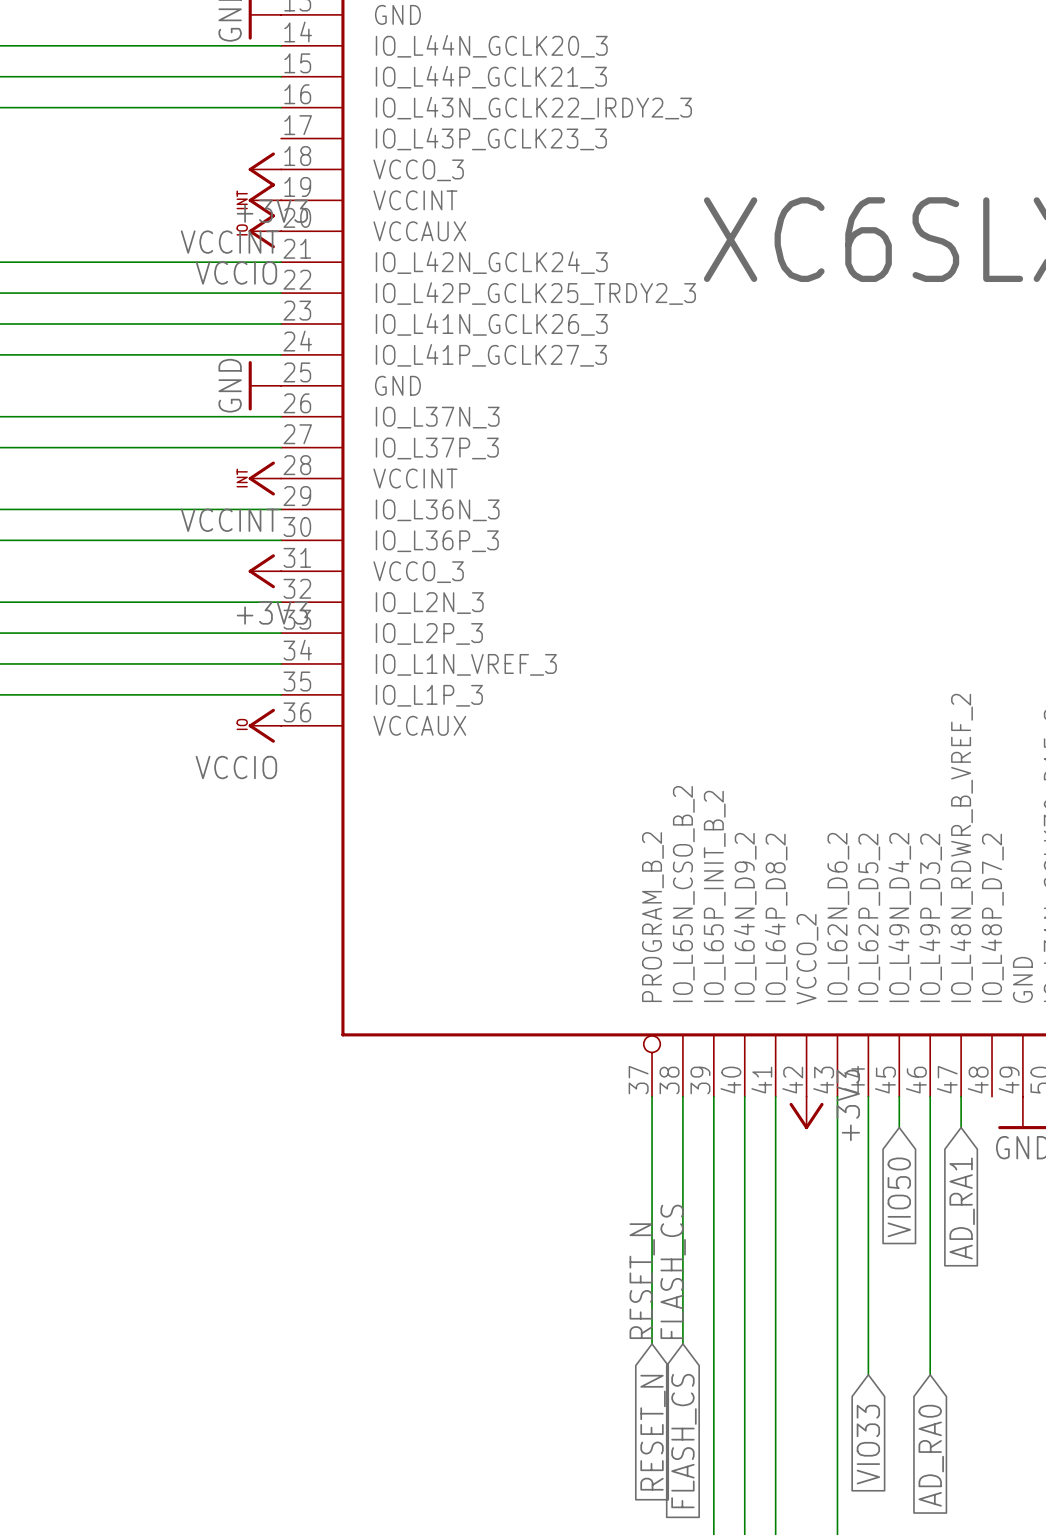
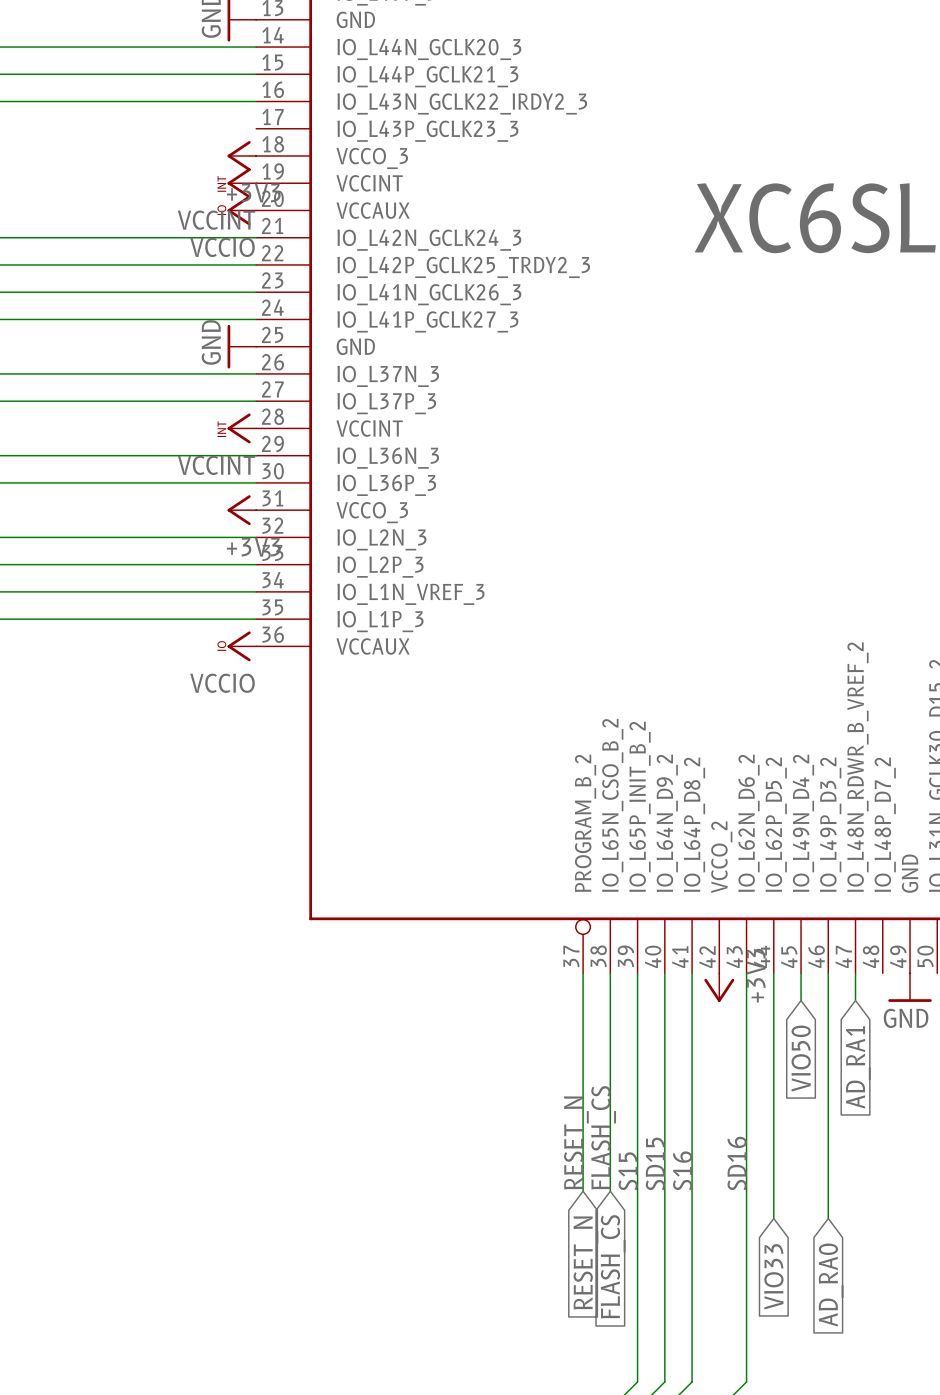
label: none -> SD15 (655, 1163)
label: none -> SD16 (737, 1163)
label: none -> S15 (628, 1171)
label: none -> S16 (682, 1170)

